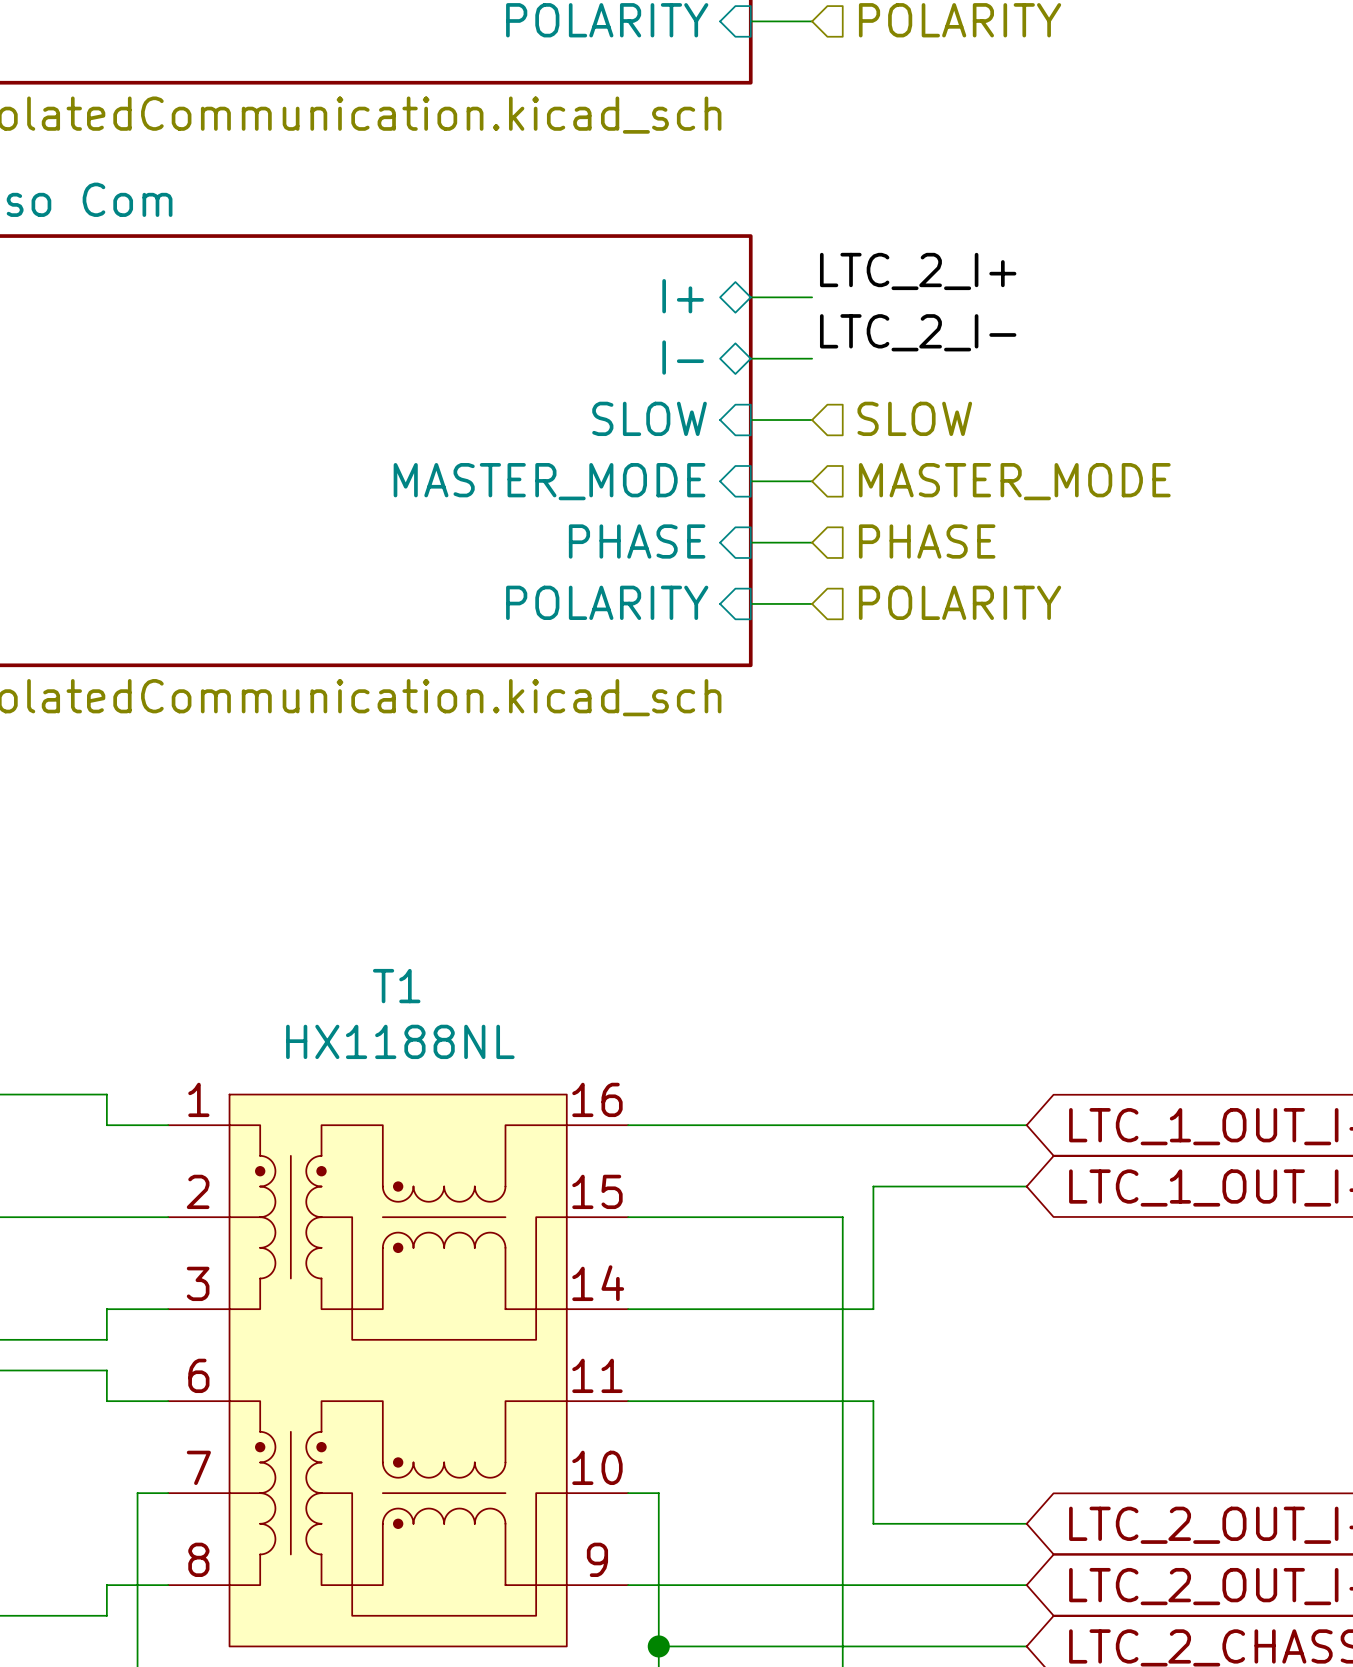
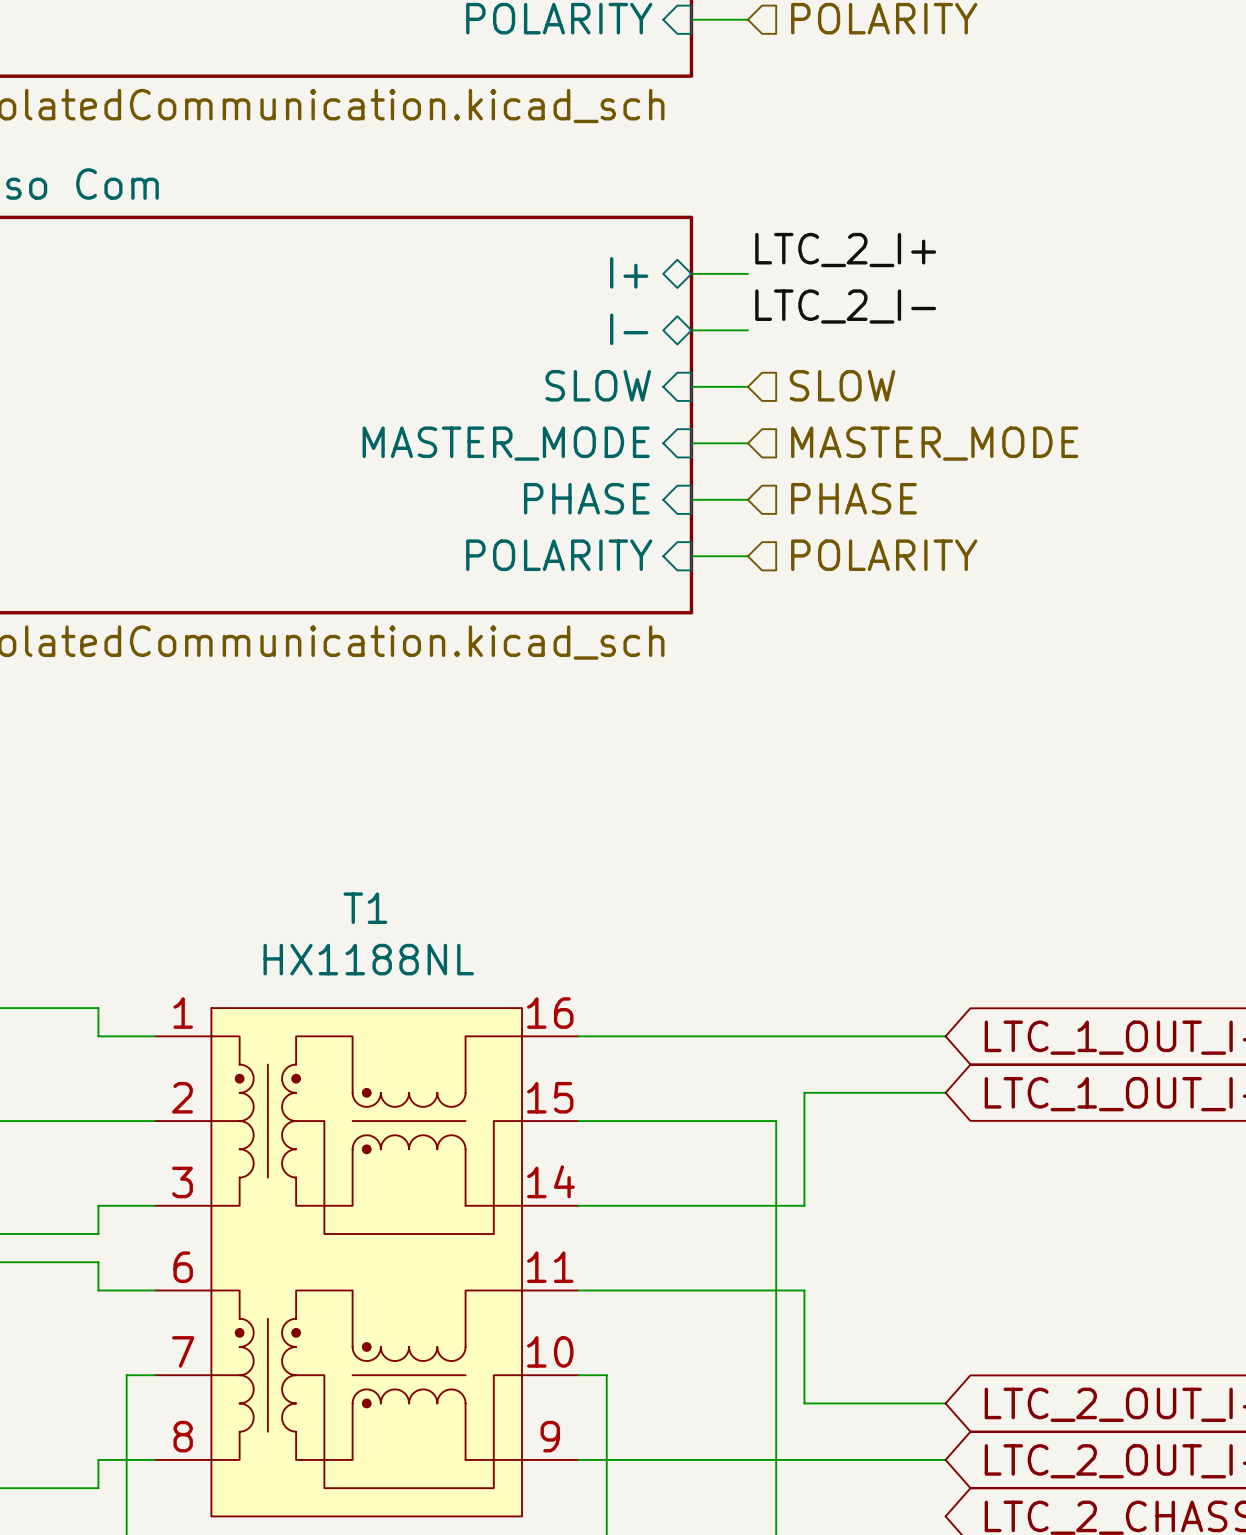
wire: (658, 1646) (1026, 1646) -> none
junction: (658, 1646) -> none

